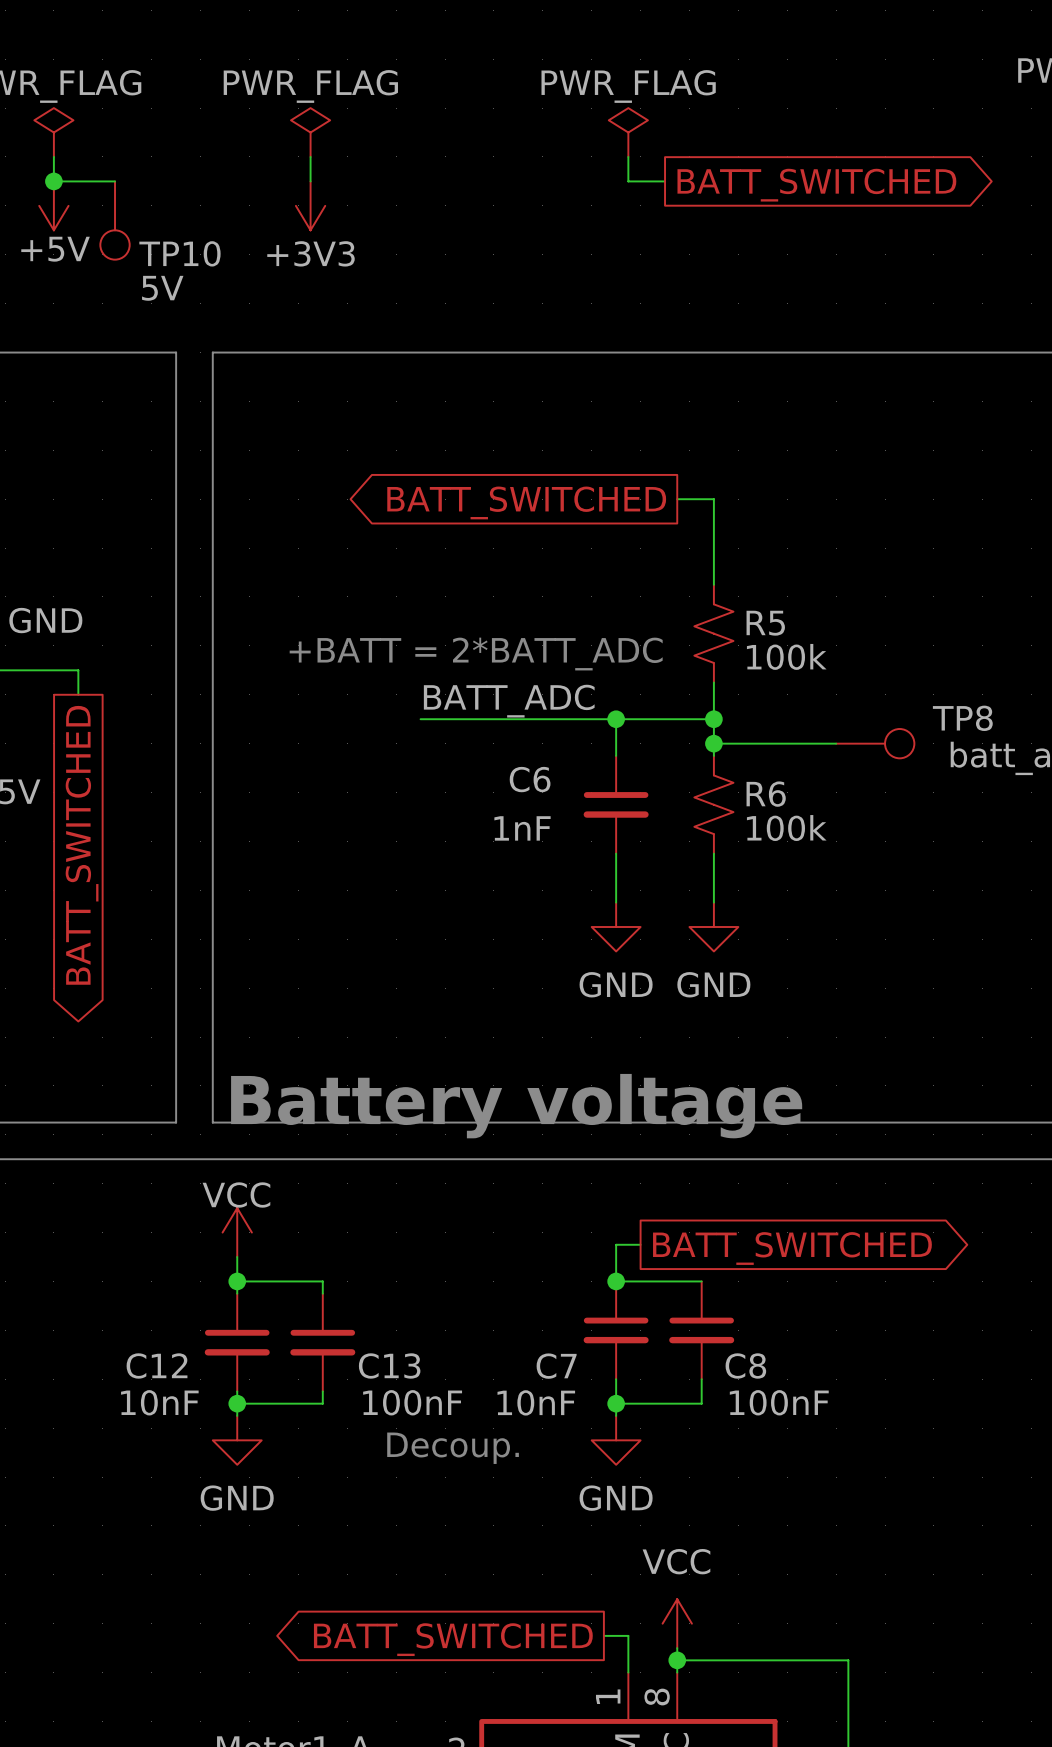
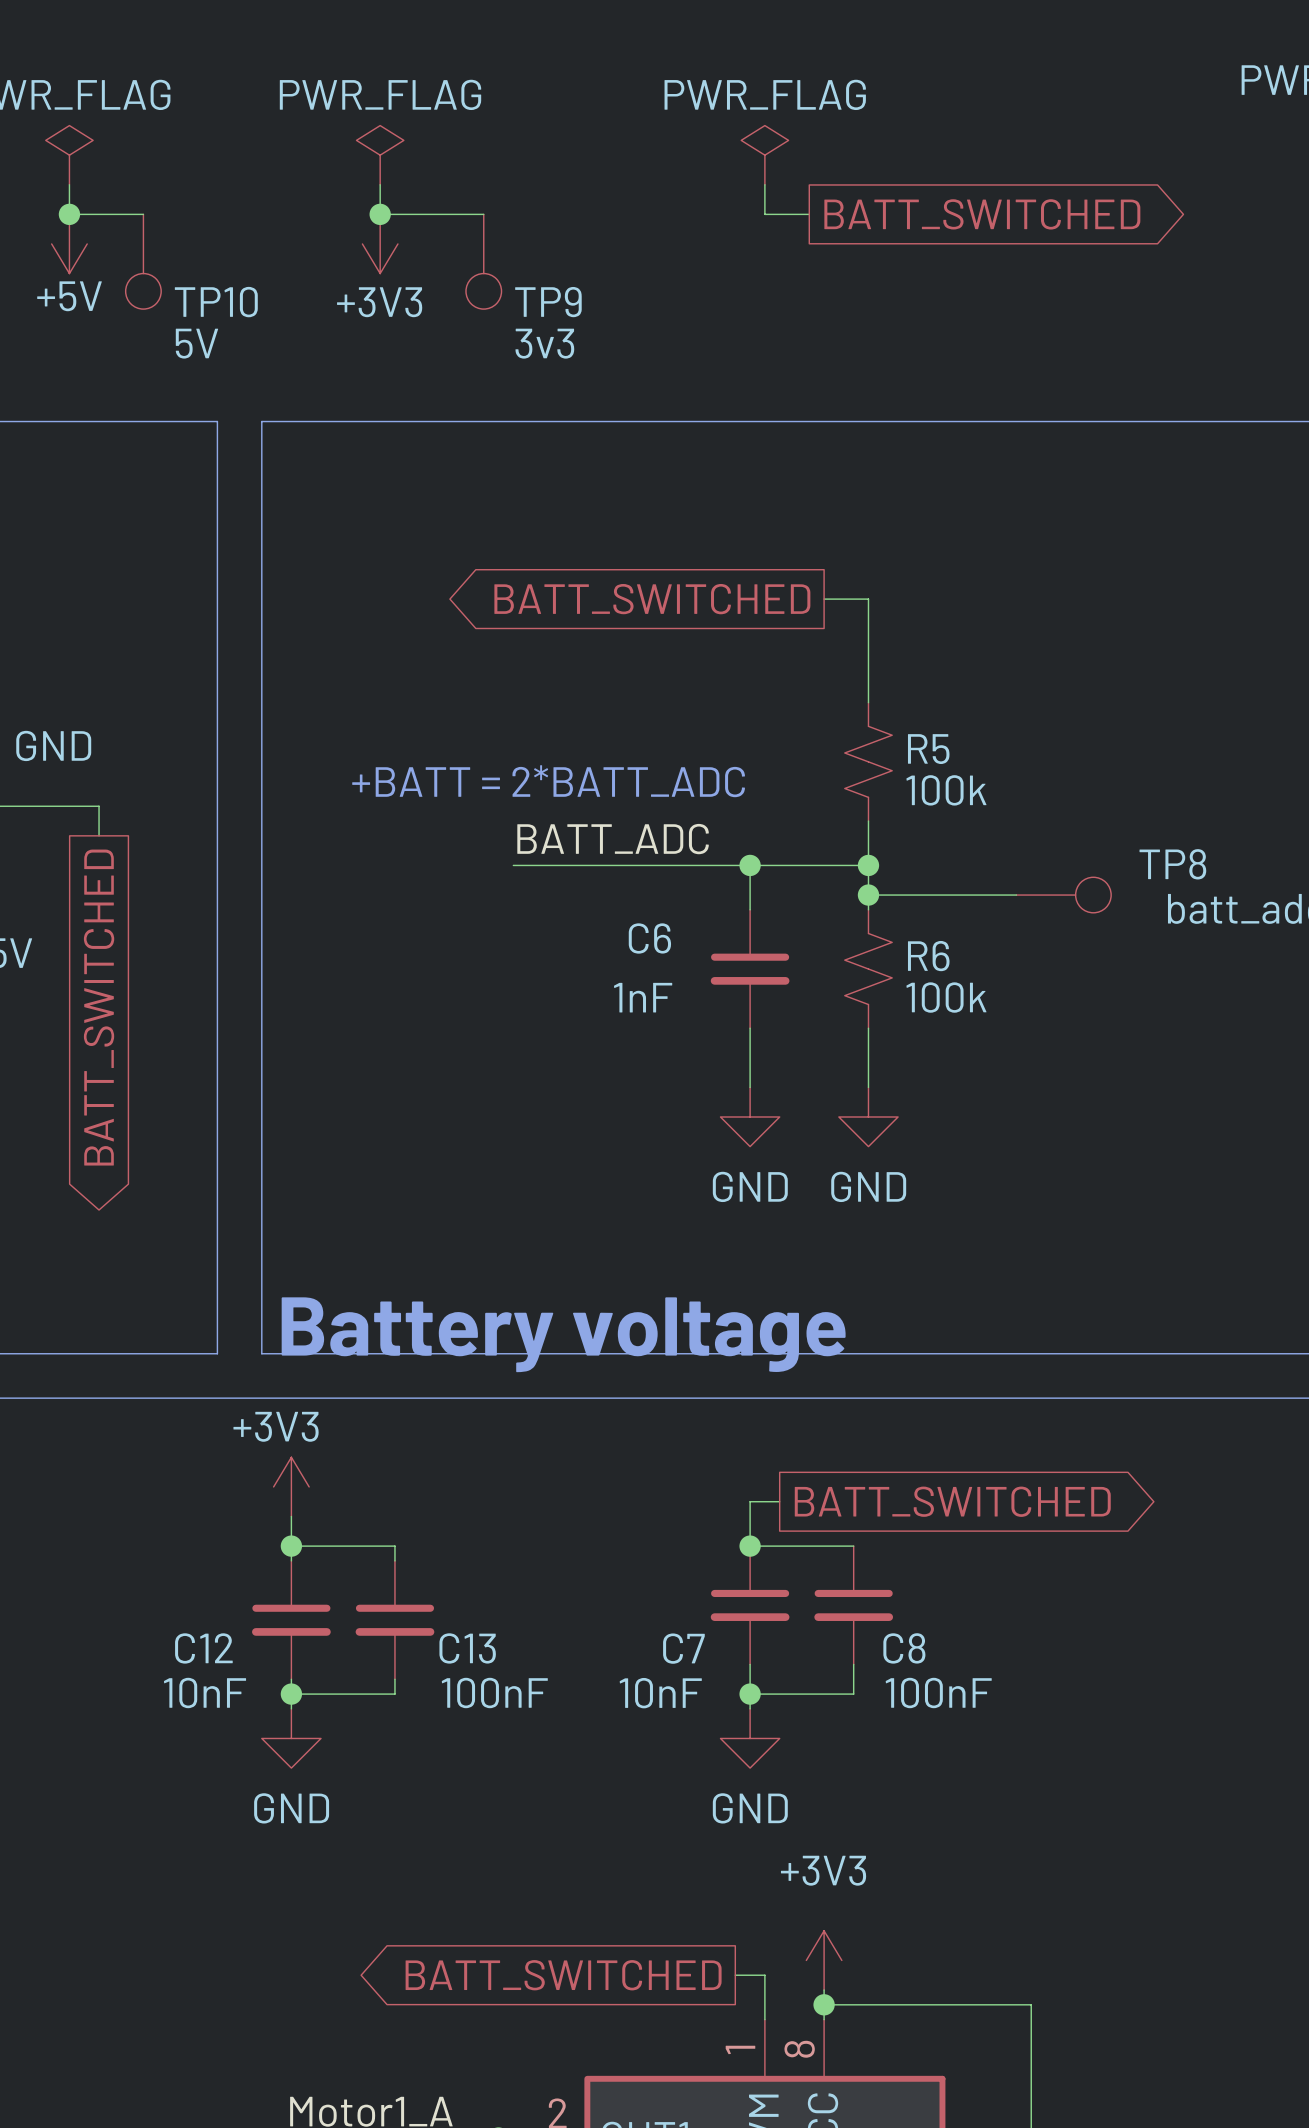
wire: none -> (380, 214) (483, 214)
junction: none -> (380, 214)
TP9: none -> 3v3 (483, 261)
power symbol: VCC (237, 1232) -> +3V3 (291, 1486)
text: Decoup. (453, 1448) -> none
power symbol: VCC (677, 1623) -> +3V3 (824, 1960)

